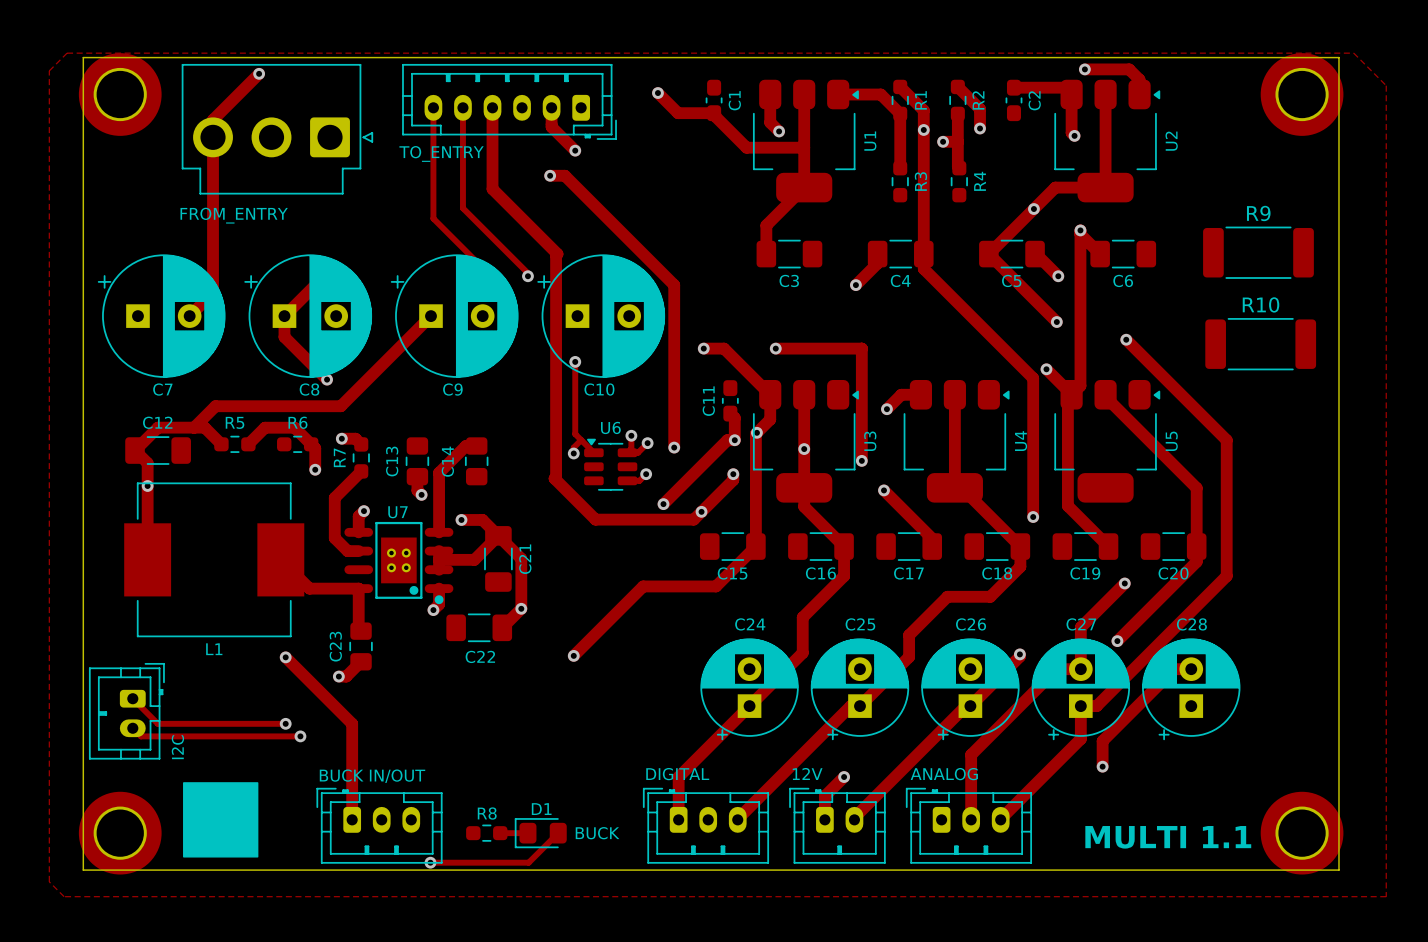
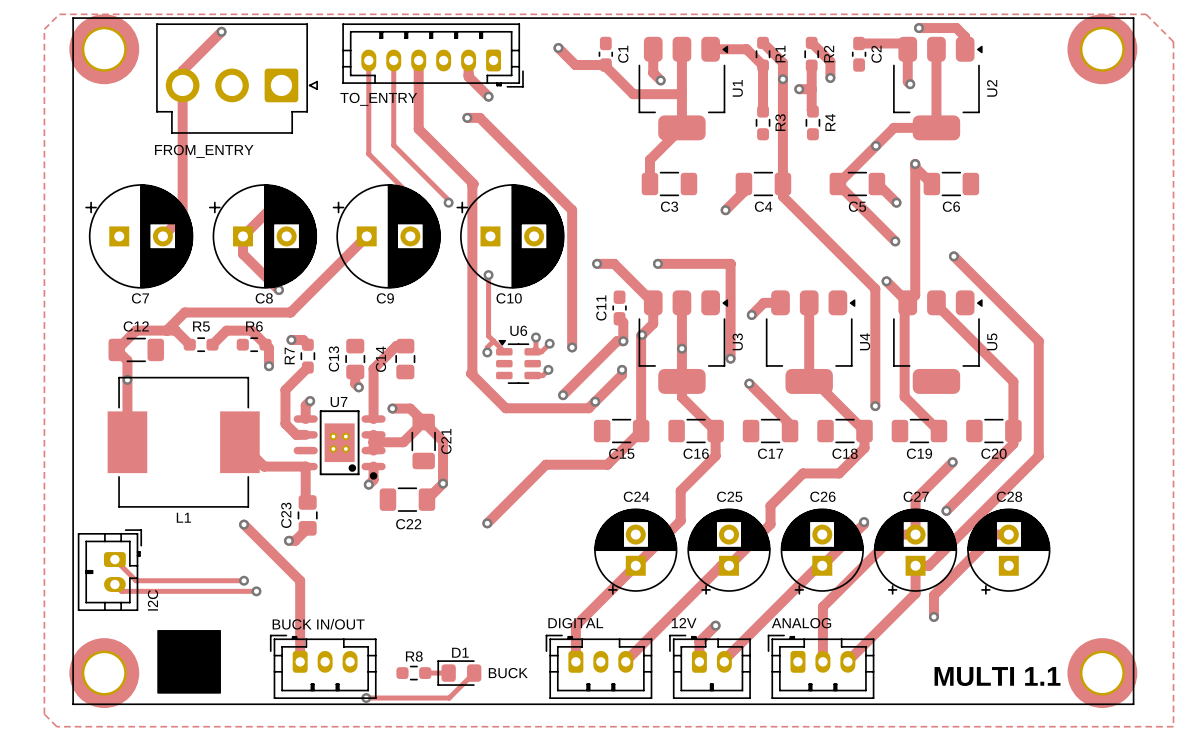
R9: (1258, 252) -> none
R10: (1260, 344) -> none

